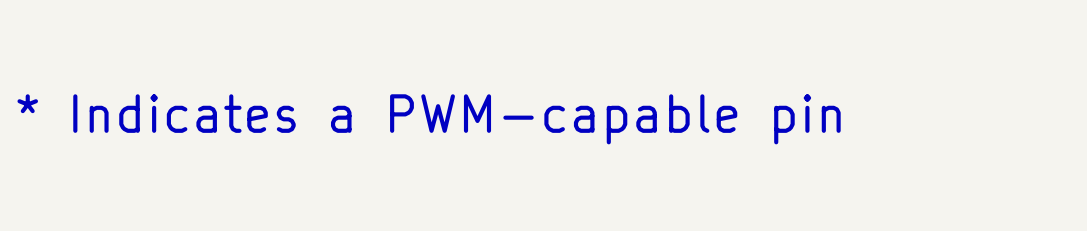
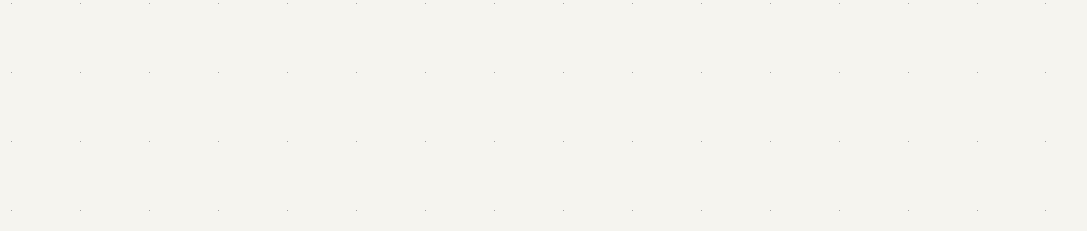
text: * Indicates a PWM-capable pin (429, 119) -> none

